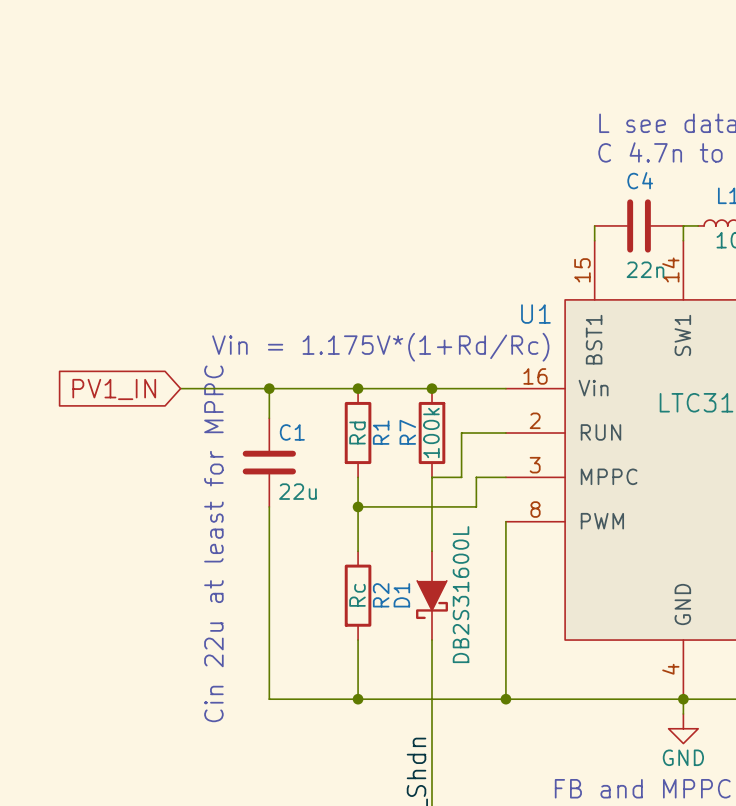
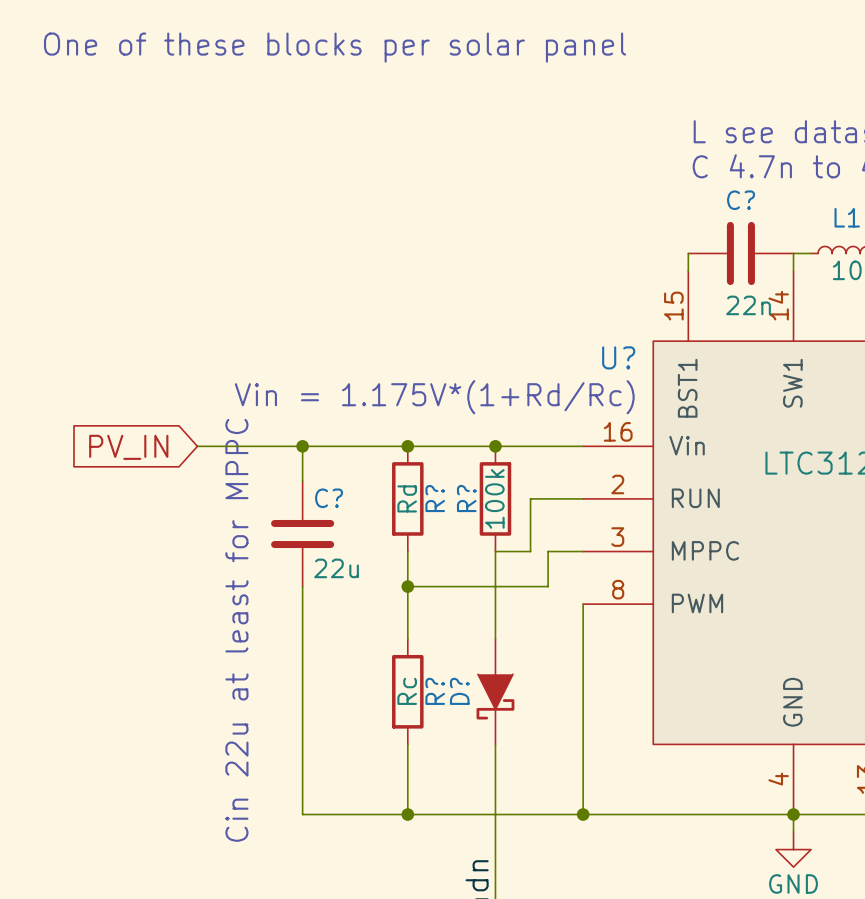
text: none -> One of these blocks per solar panel (335, 47)
C4 name: C4 (640, 180) -> C? (741, 200)
U1 name: U1 (535, 314) -> U? (618, 357)
global label: PV1_IN (114, 389) -> PV_IN (128, 447)
C1 name: C1 (292, 432) -> C? (329, 498)
R1 name: R1 (381, 432) -> R? (435, 498)
R7 name: R7 (407, 432) -> R? (466, 498)
D1 value: DB2S31600L (461, 594) -> none
R2 name: R2 (381, 595) -> R? (435, 691)
D1 name: D1 (401, 595) -> D? (459, 691)

